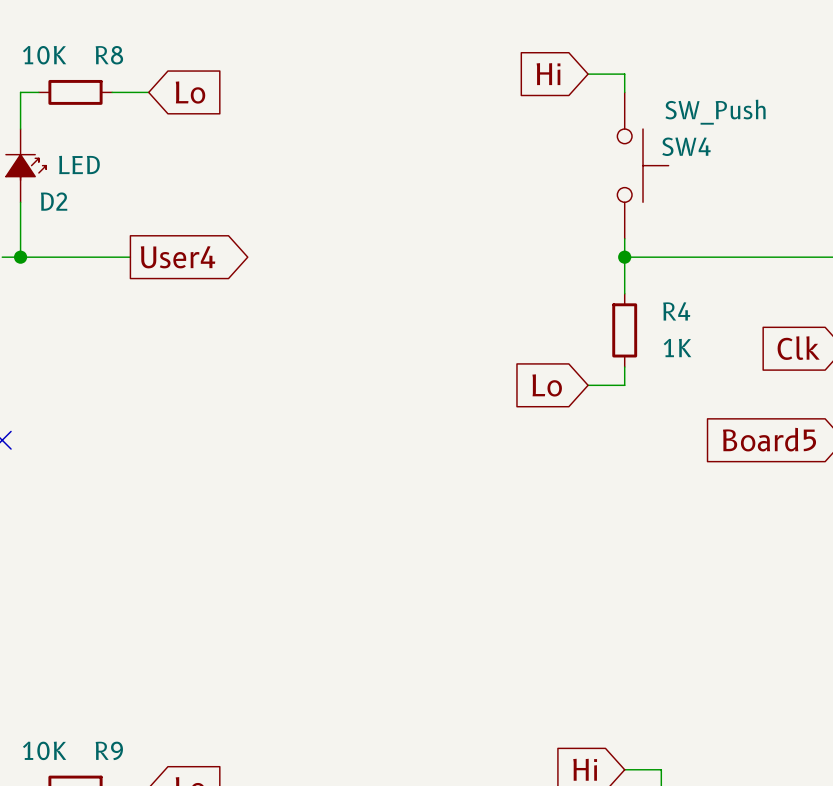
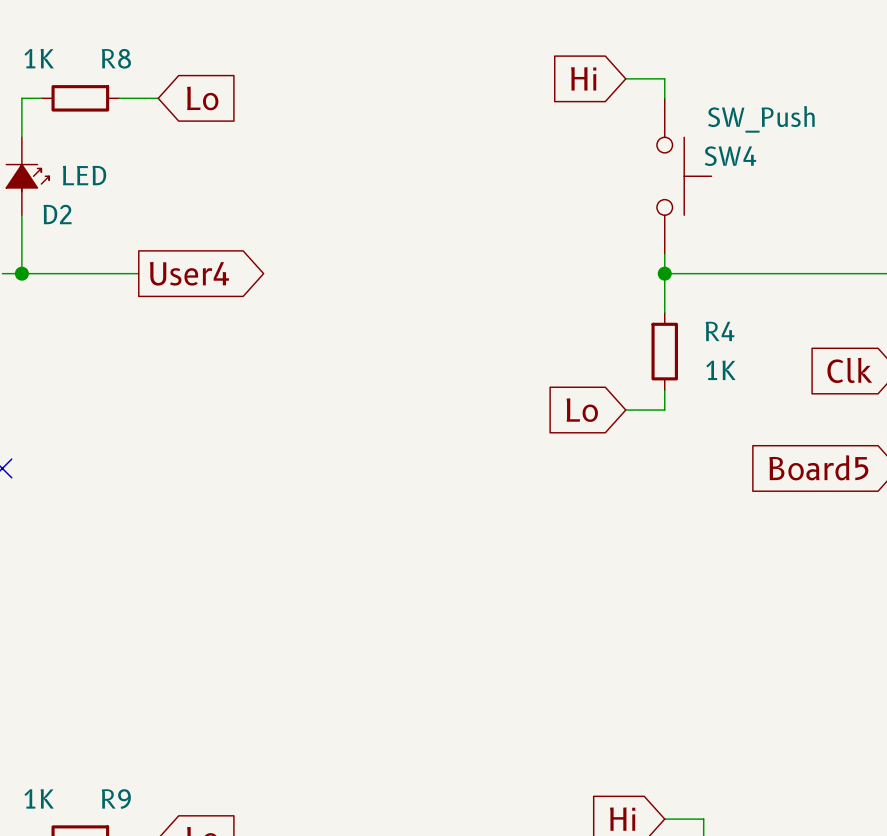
R8 value: 10K (44, 55) -> 1K (39, 58)
R9 value: 10K (44, 750) -> 1K (39, 798)

